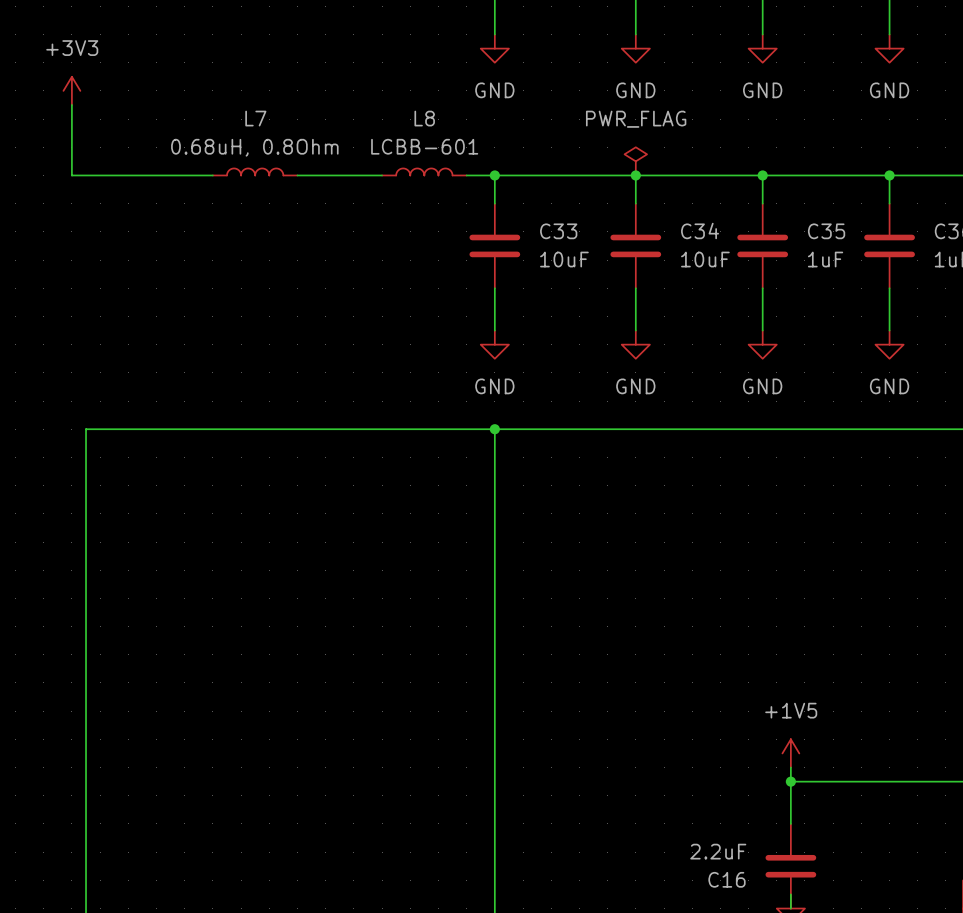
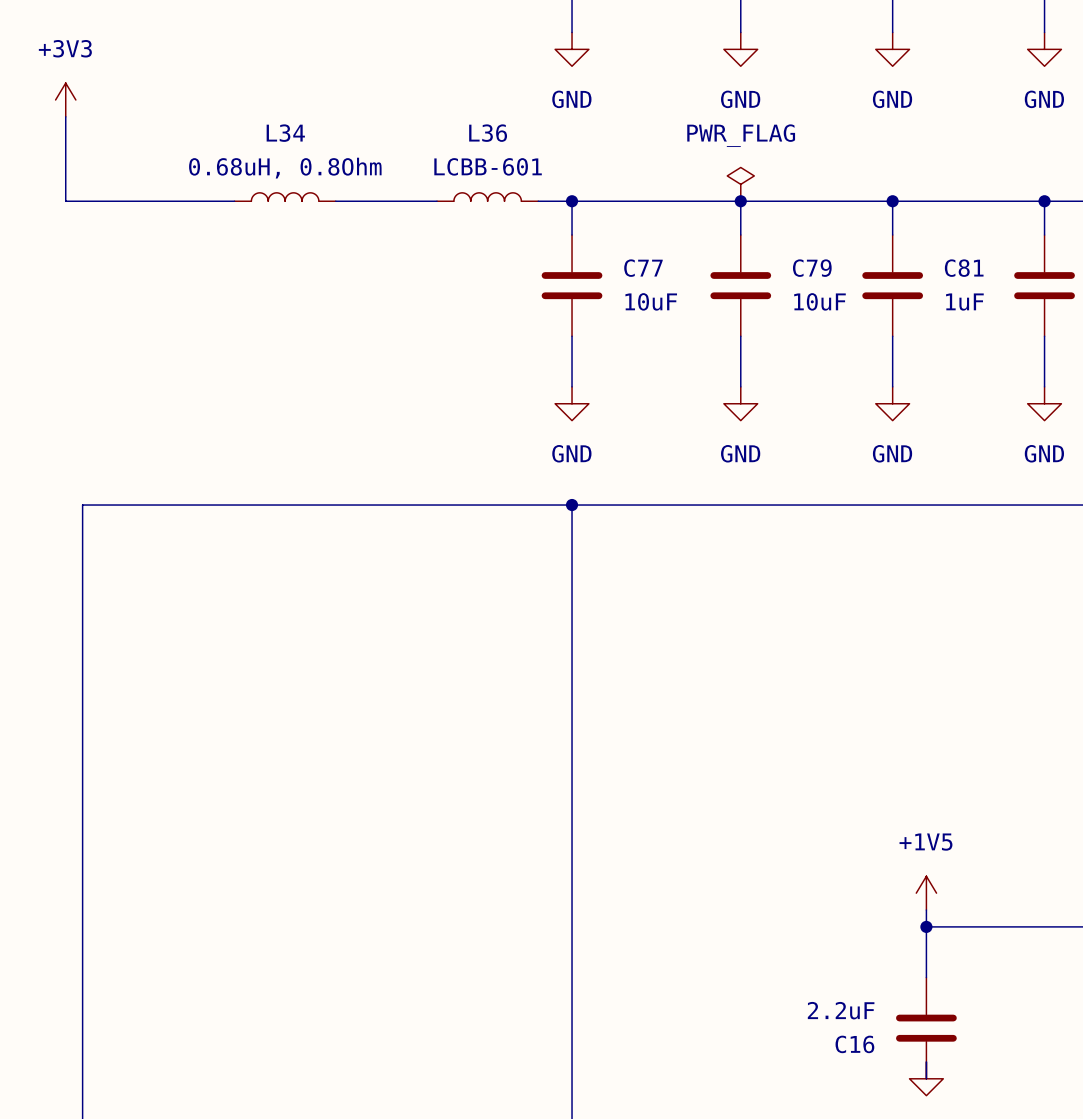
L7 name: L7 (255, 118) -> L34 (285, 133)
L8 name: L8 (424, 118) -> L36 (488, 133)
C34 name: C34 (700, 230) -> C79 (812, 268)
C33 name: C33 (558, 231) -> C77 (643, 268)
C35 name: C35 (826, 231) -> C81 (964, 268)

